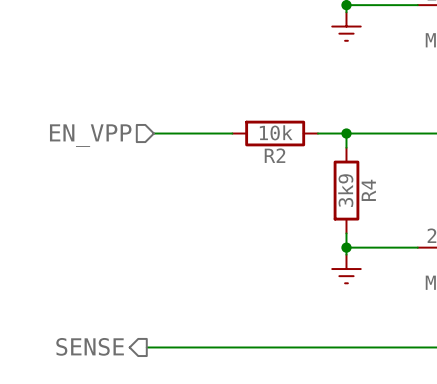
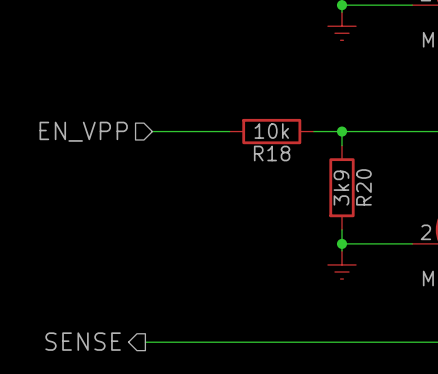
R2 name: R2 (275, 155) -> R18 (272, 153)
R4 name: R4 (368, 190) -> R20 (363, 187)

